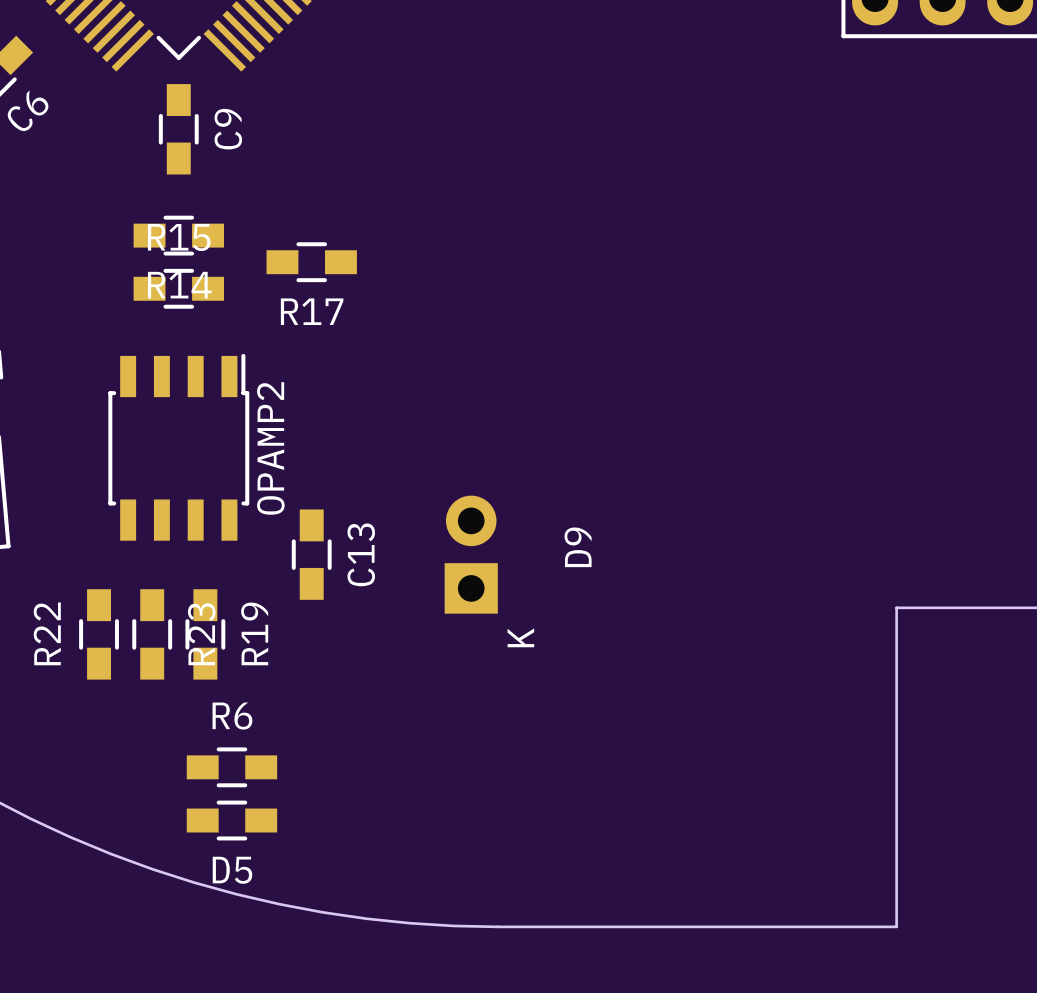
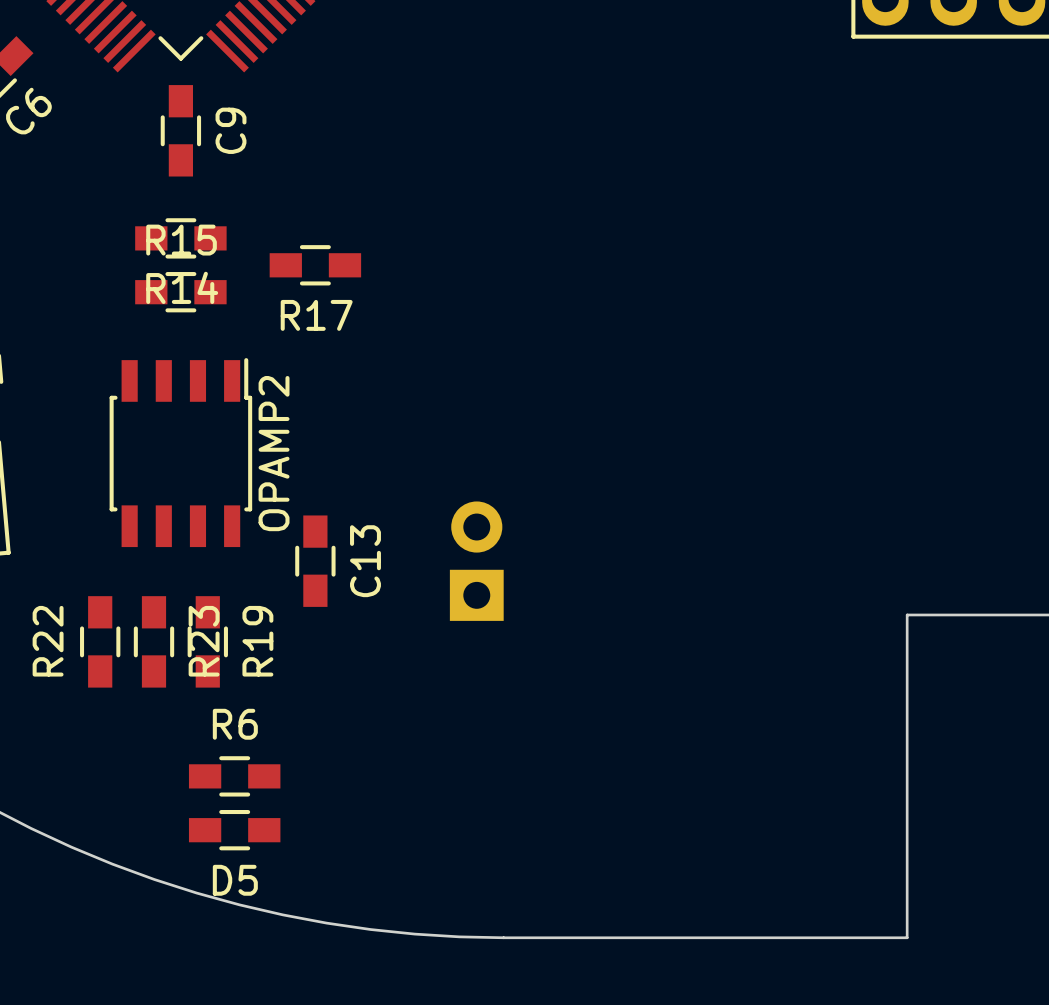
D9 name: D9 (578, 547) -> none
D9 text: K (520, 637) -> none

